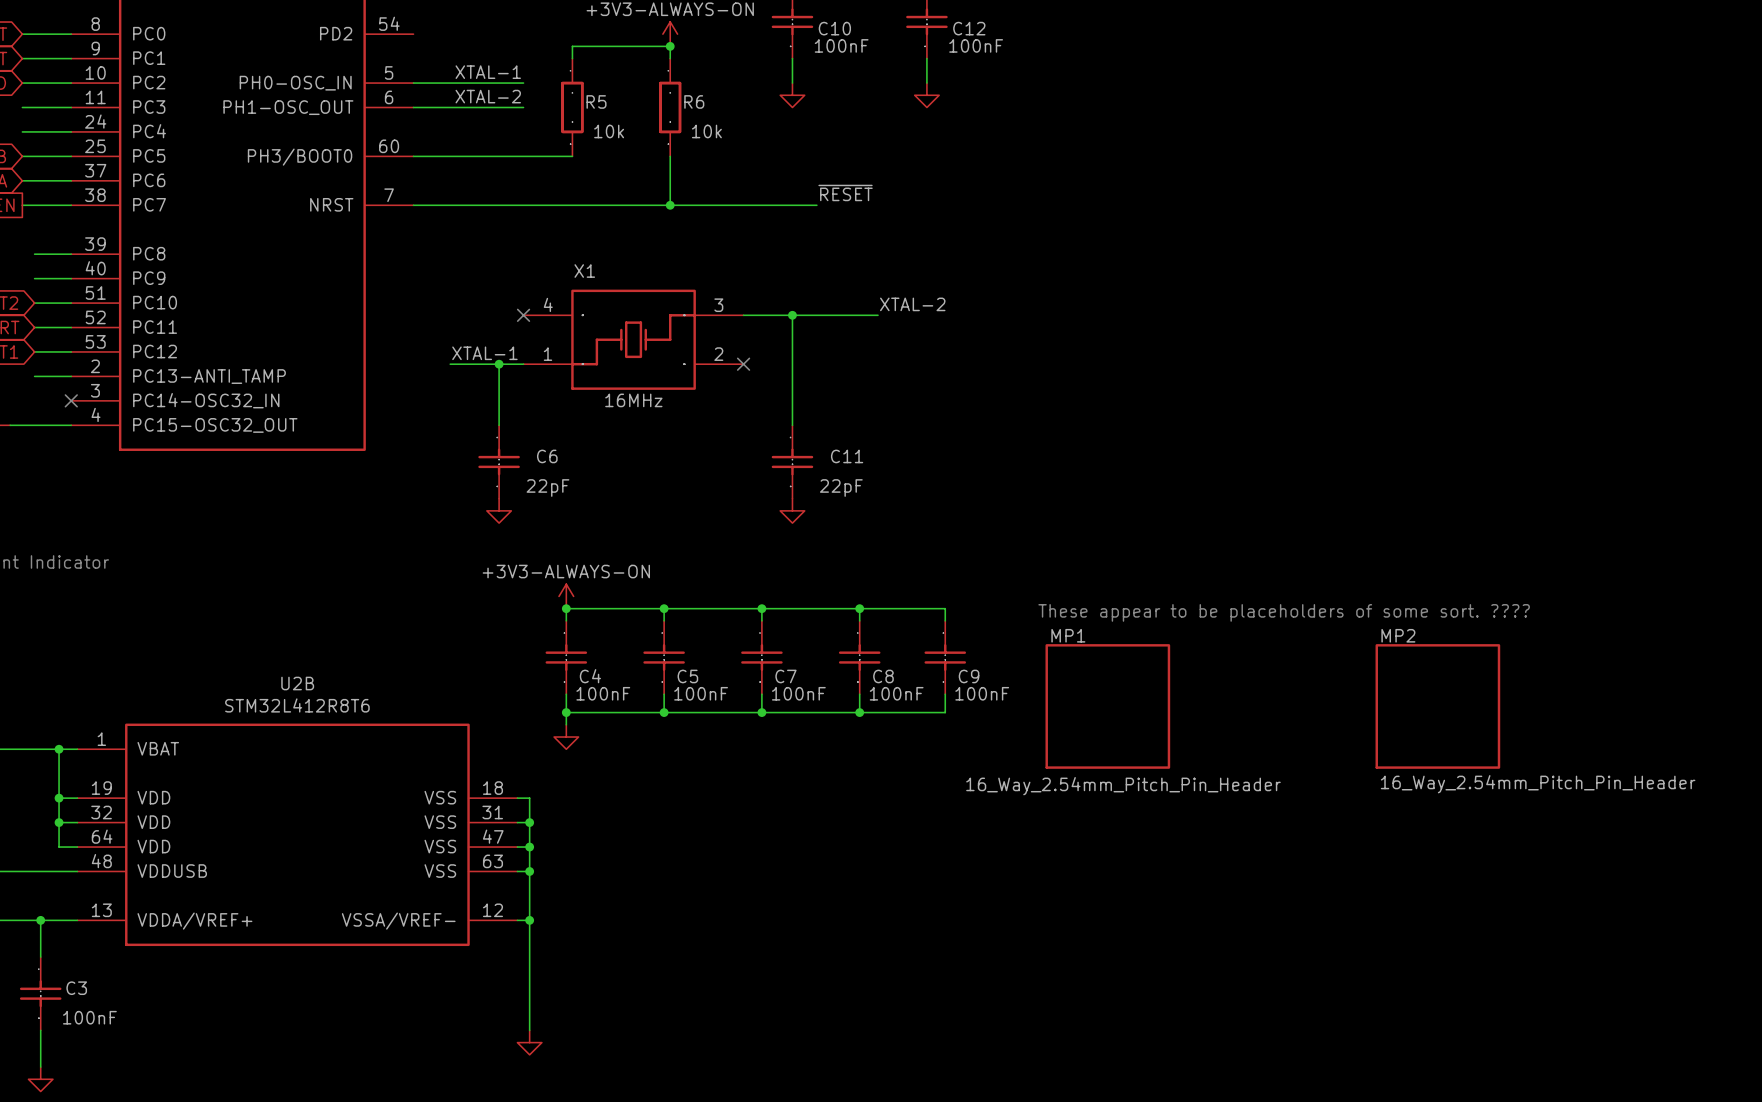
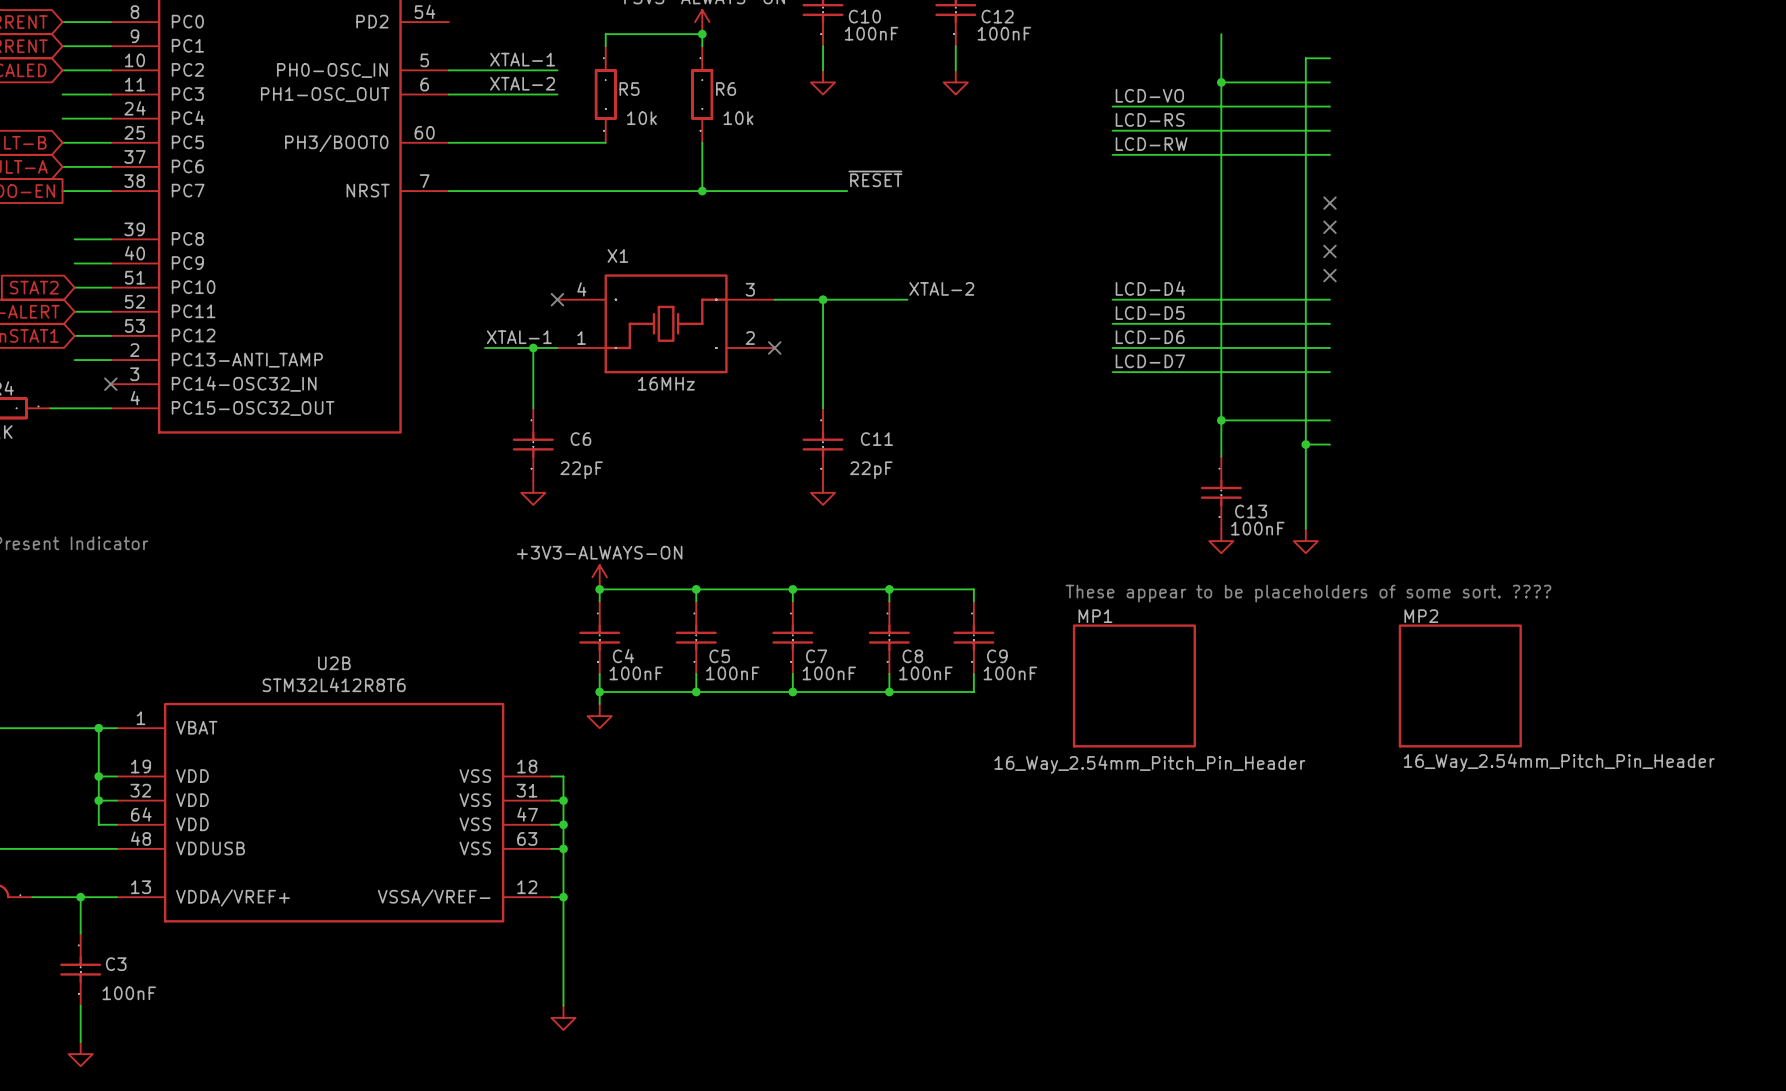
wire: none -> (1221, 34) (1221, 456)
wire: none -> (1329, 58) (1305, 58) (1305, 529)
wire: none -> (1221, 82) (1329, 82)
junction: none -> (1221, 82)
label: none -> LCD-VO (1149, 95)
wire: none -> (1112, 106) (1329, 106)
label: none -> LCD-RS (1150, 119)
wire: none -> (1112, 130) (1329, 130)
label: none -> LCD-RW (1151, 144)
wire: none -> (1112, 154) (1329, 154)
no-connect mark: none -> (1329, 203)
no-connect mark: none -> (1329, 227)
no-connect mark: none -> (1329, 251)
no-connect mark: none -> (1329, 275)
label: none -> LCD-D4 (1150, 288)
wire: none -> (1112, 299) (1329, 299)
label: none -> LCD-D5 (1150, 313)
wire: none -> (1112, 323) (1329, 323)
label: none -> LCD-D6 (1150, 337)
wire: none -> (1112, 347) (1329, 347)
label: none -> LCD-D7 (1150, 361)
wire: none -> (1112, 372) (1329, 372)
wire: none -> (1221, 420) (1329, 420)
junction: none -> (1221, 420)
wire: none -> (1305, 444) (1329, 444)
junction: none -> (1305, 444)
C13: none -> (1221, 492)
power symbol: none -> (1221, 541)
power symbol: none -> (1305, 541)

